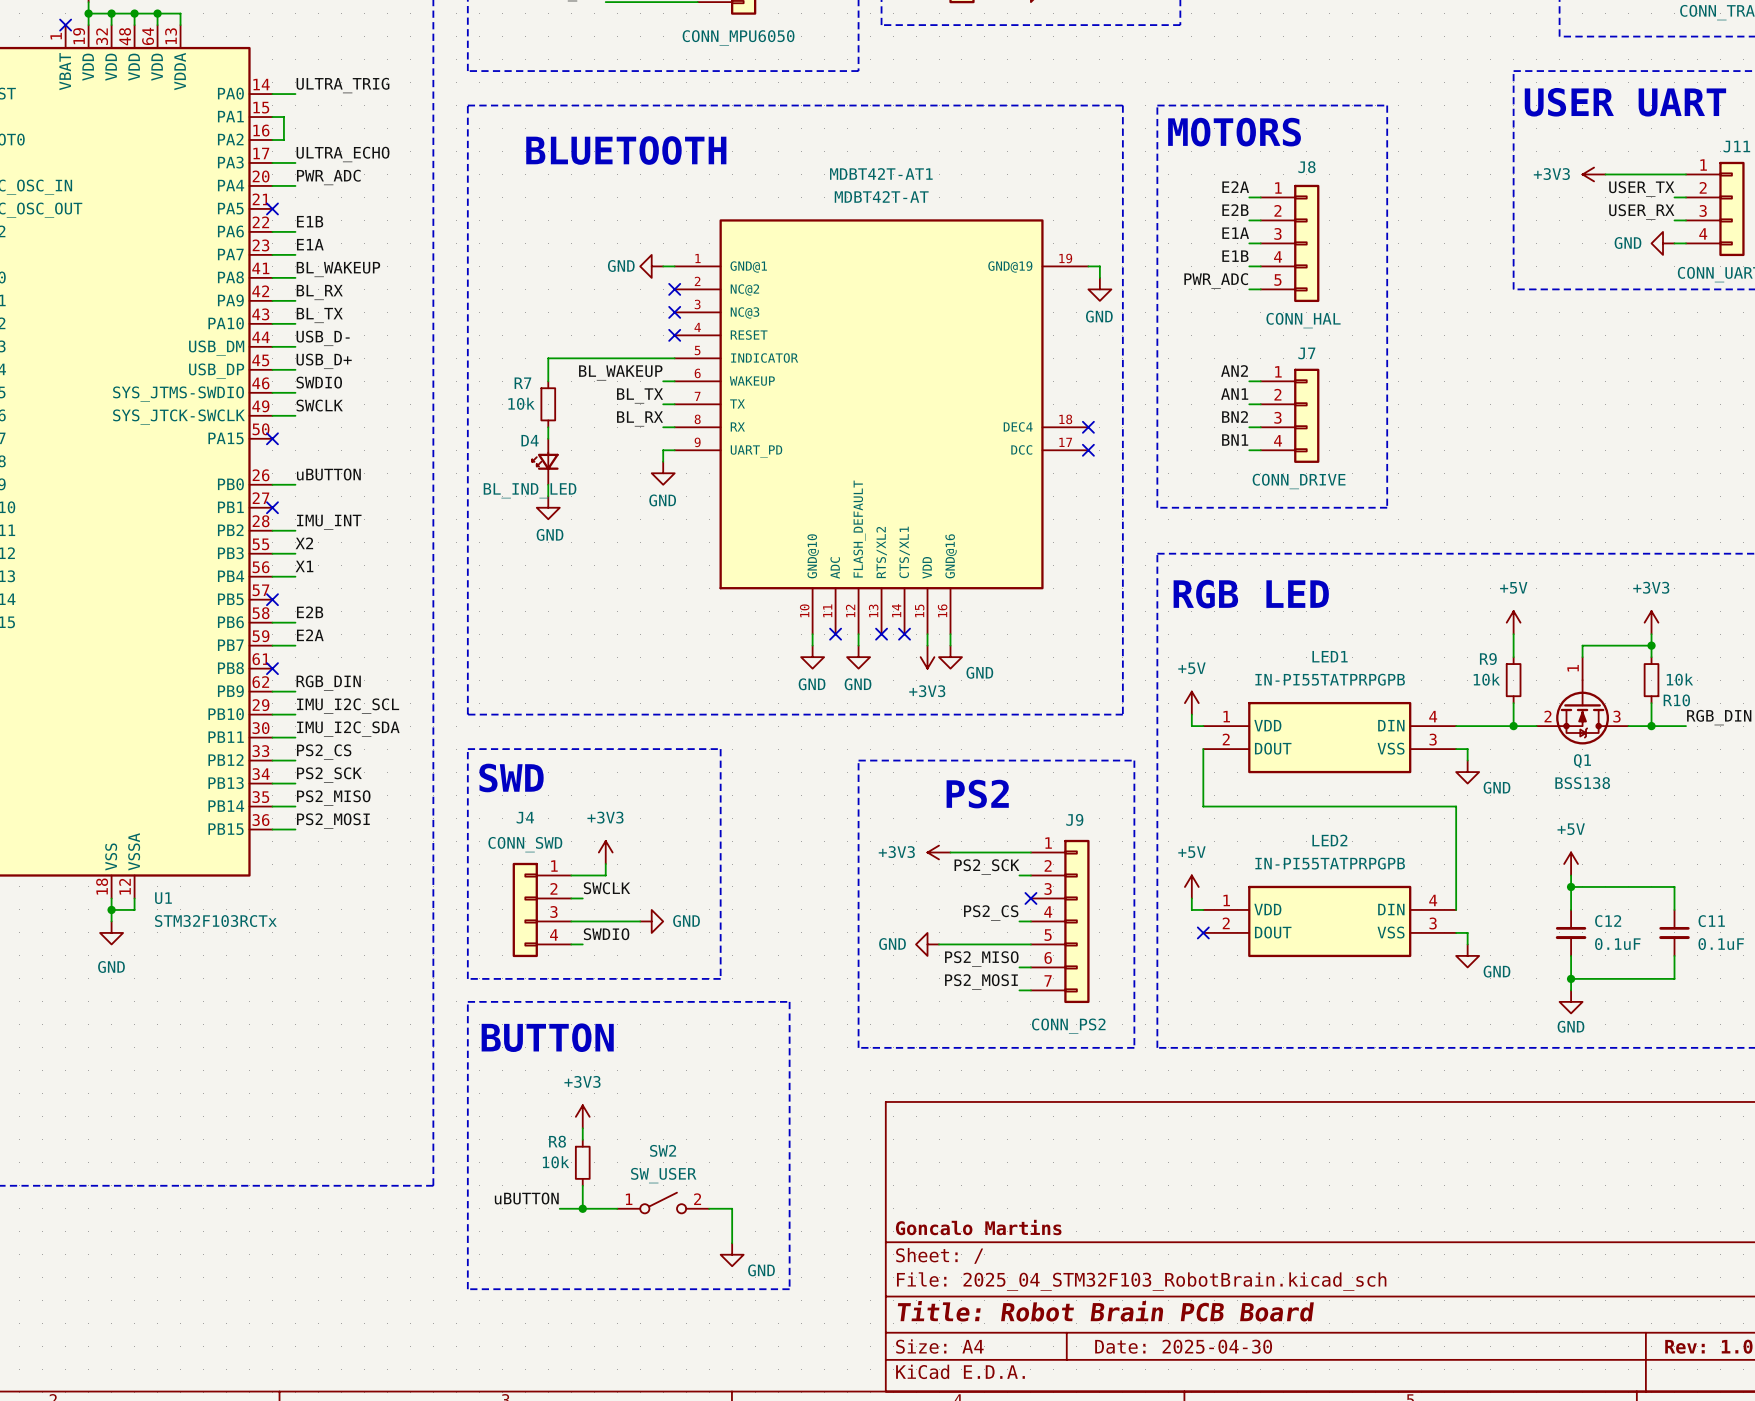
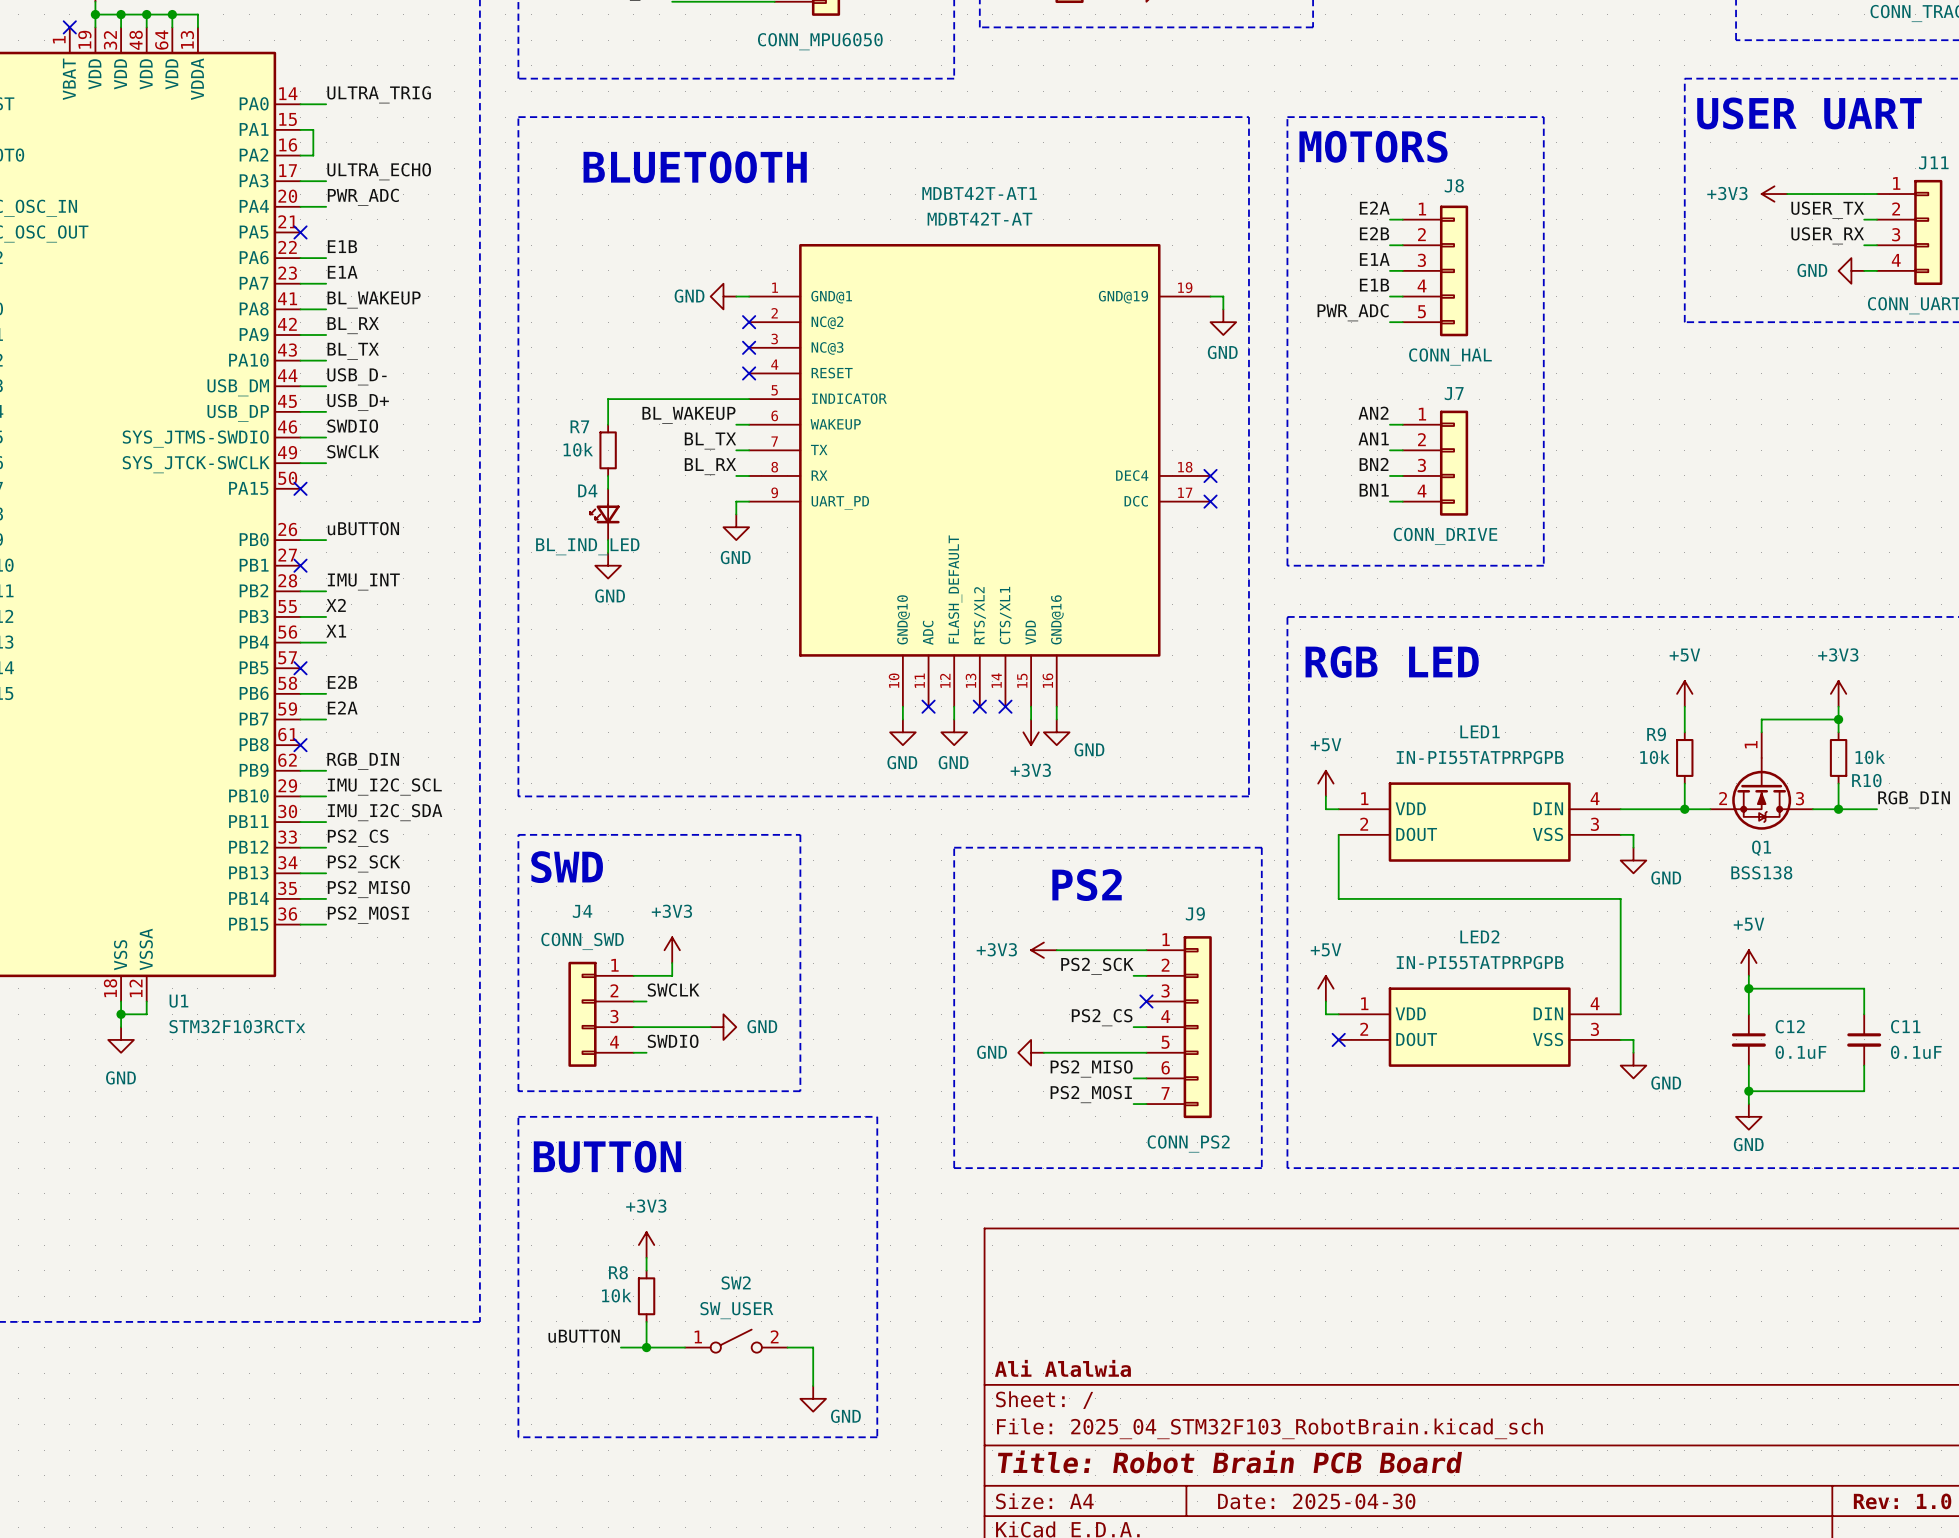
title block: Goncalo Martins (978, 1227) -> Ali Alalwia (1062, 1368)

